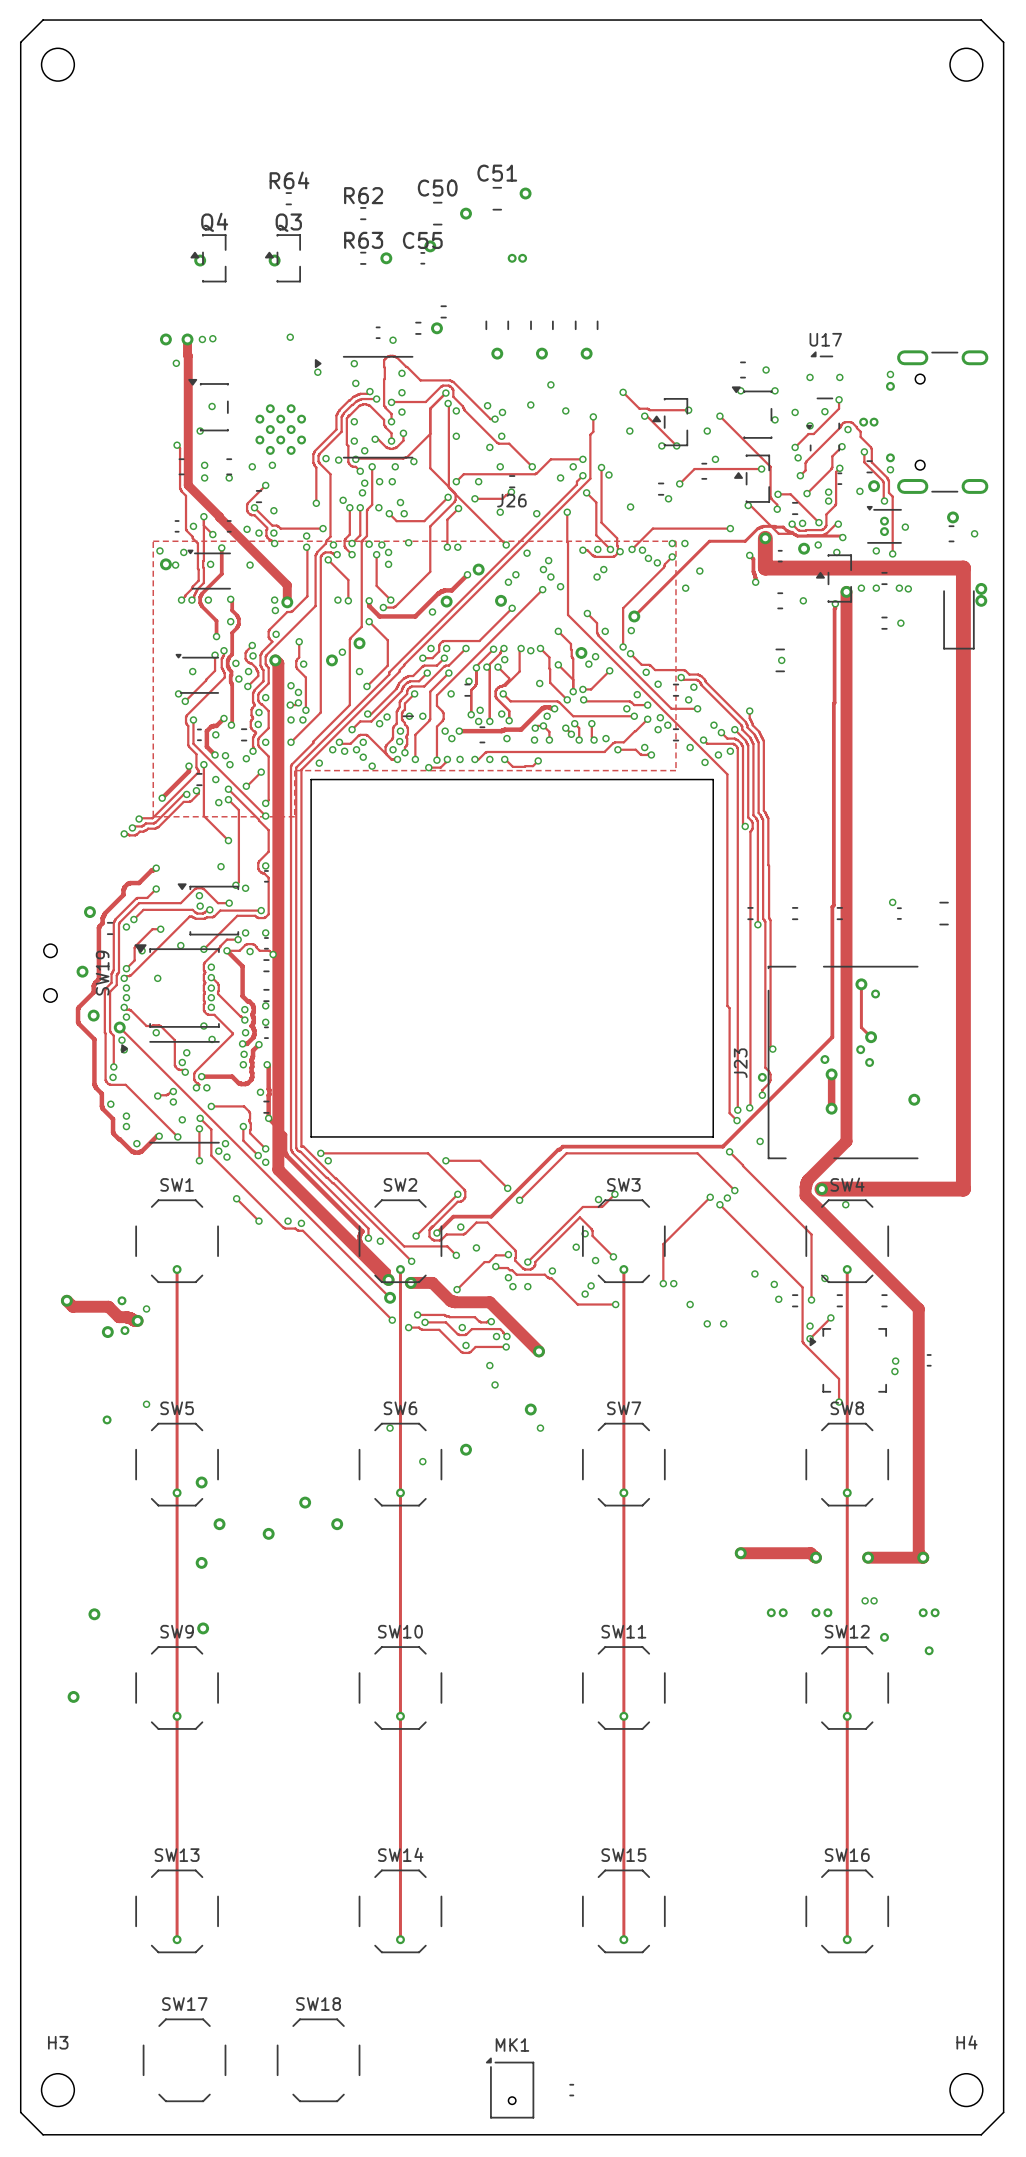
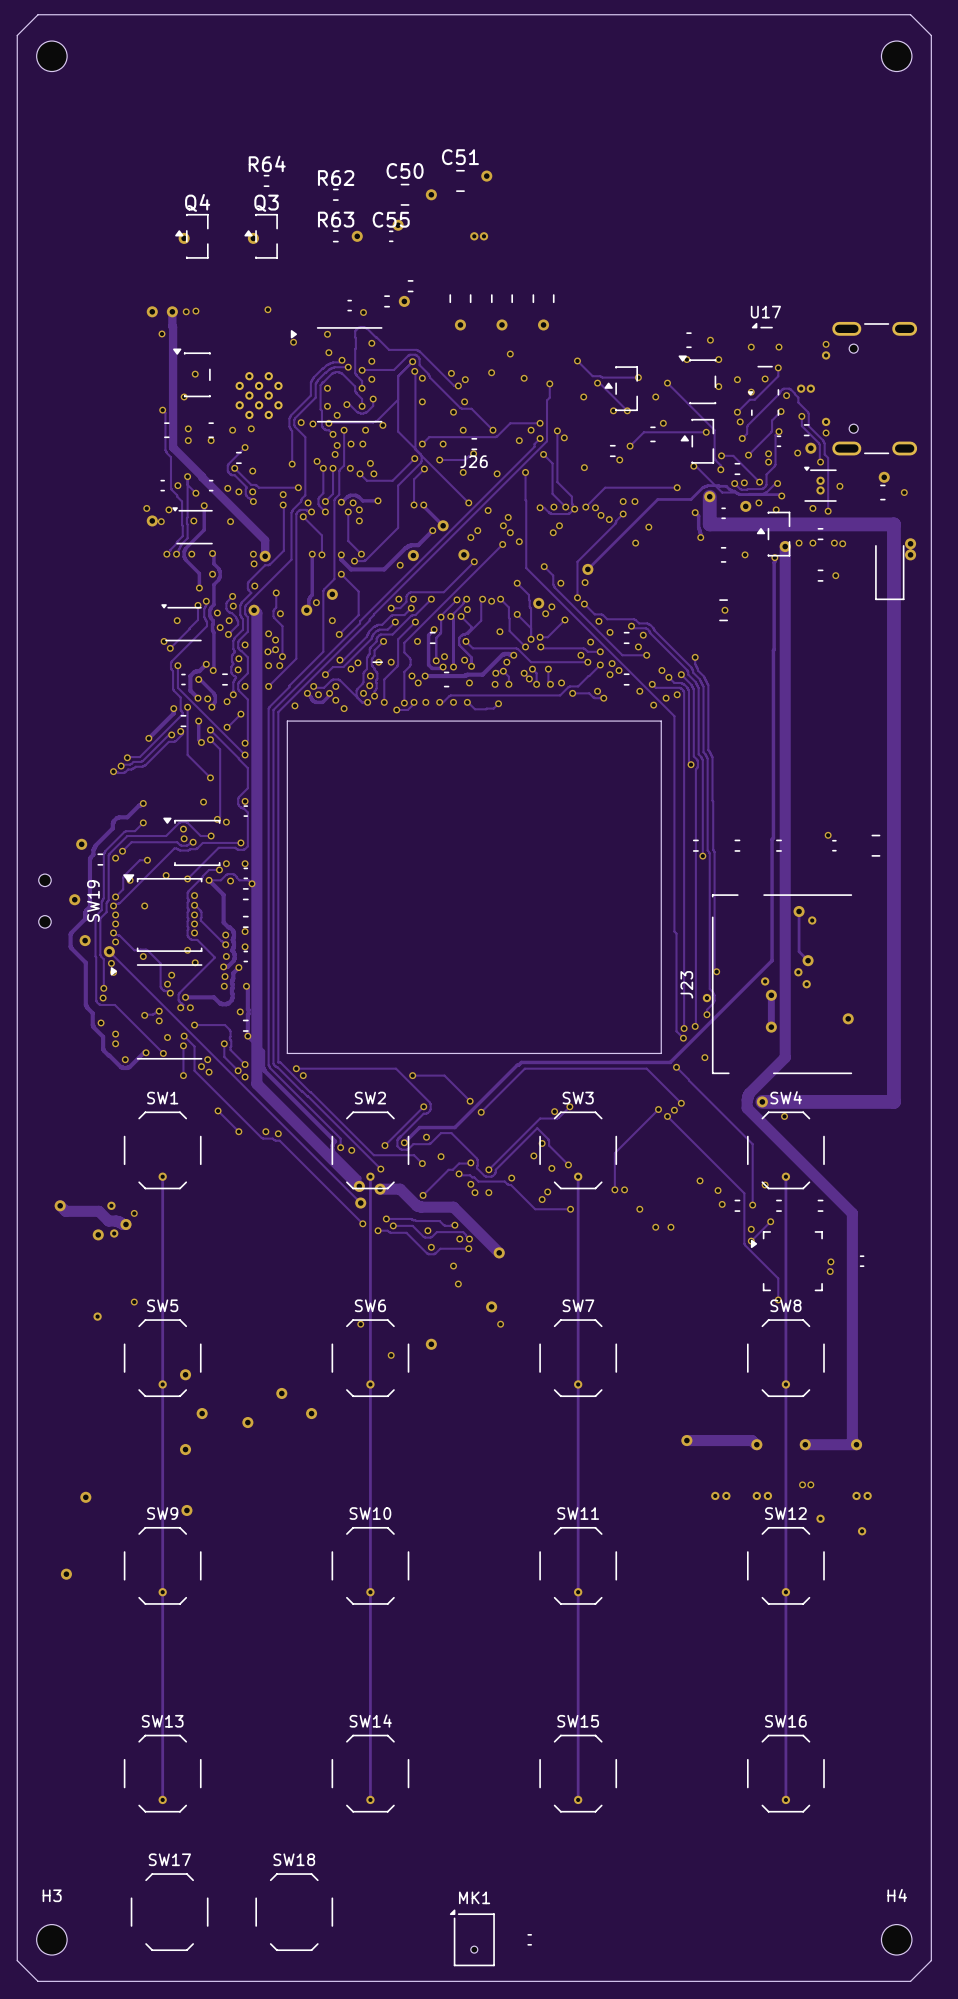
zone outline: (153, 541) (675, 541) (675, 770) (294, 770) (294, 816) (153, 816) (153, 541) -> none
track: none -> (378, 500) (362, 500) (355, 495) (350, 495) (341, 502)
track: none -> (423, 505) (443, 525)
track: none -> (312, 554) (312, 595) (308, 599) (308, 608) (306, 610)
track: none -> (434, 629) (428, 635) (428, 664) (432, 668) (443, 667)
track: none -> (198, 679) (215, 696) (215, 701) (211, 707)
track: none -> (307, 693) (315, 702) (322, 702) (329, 693)
track: none -> (198, 721) (198, 739) (201, 742)

